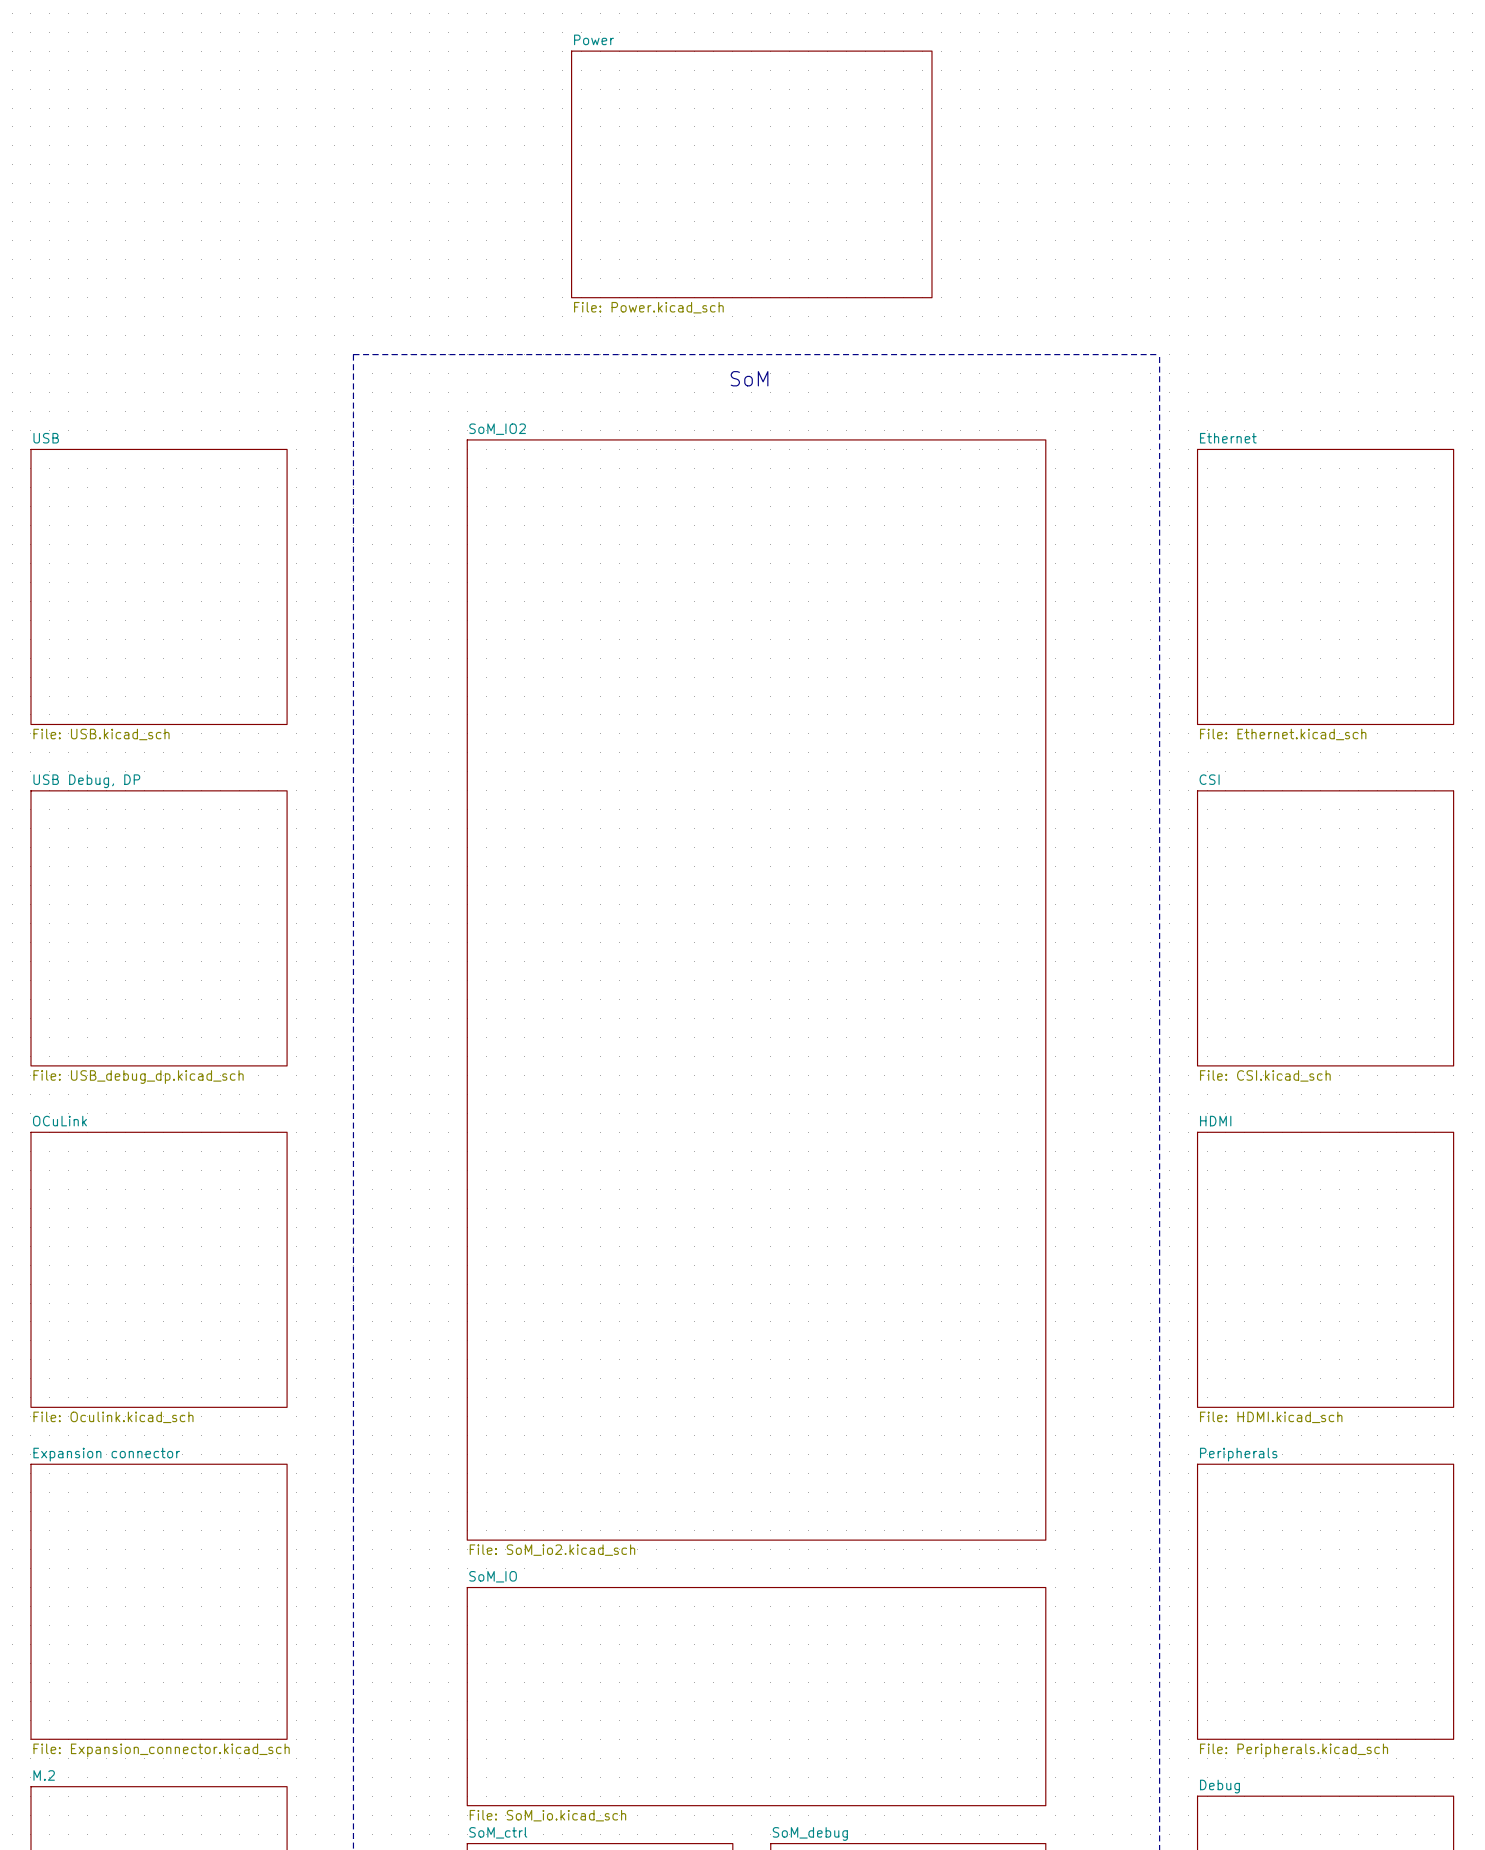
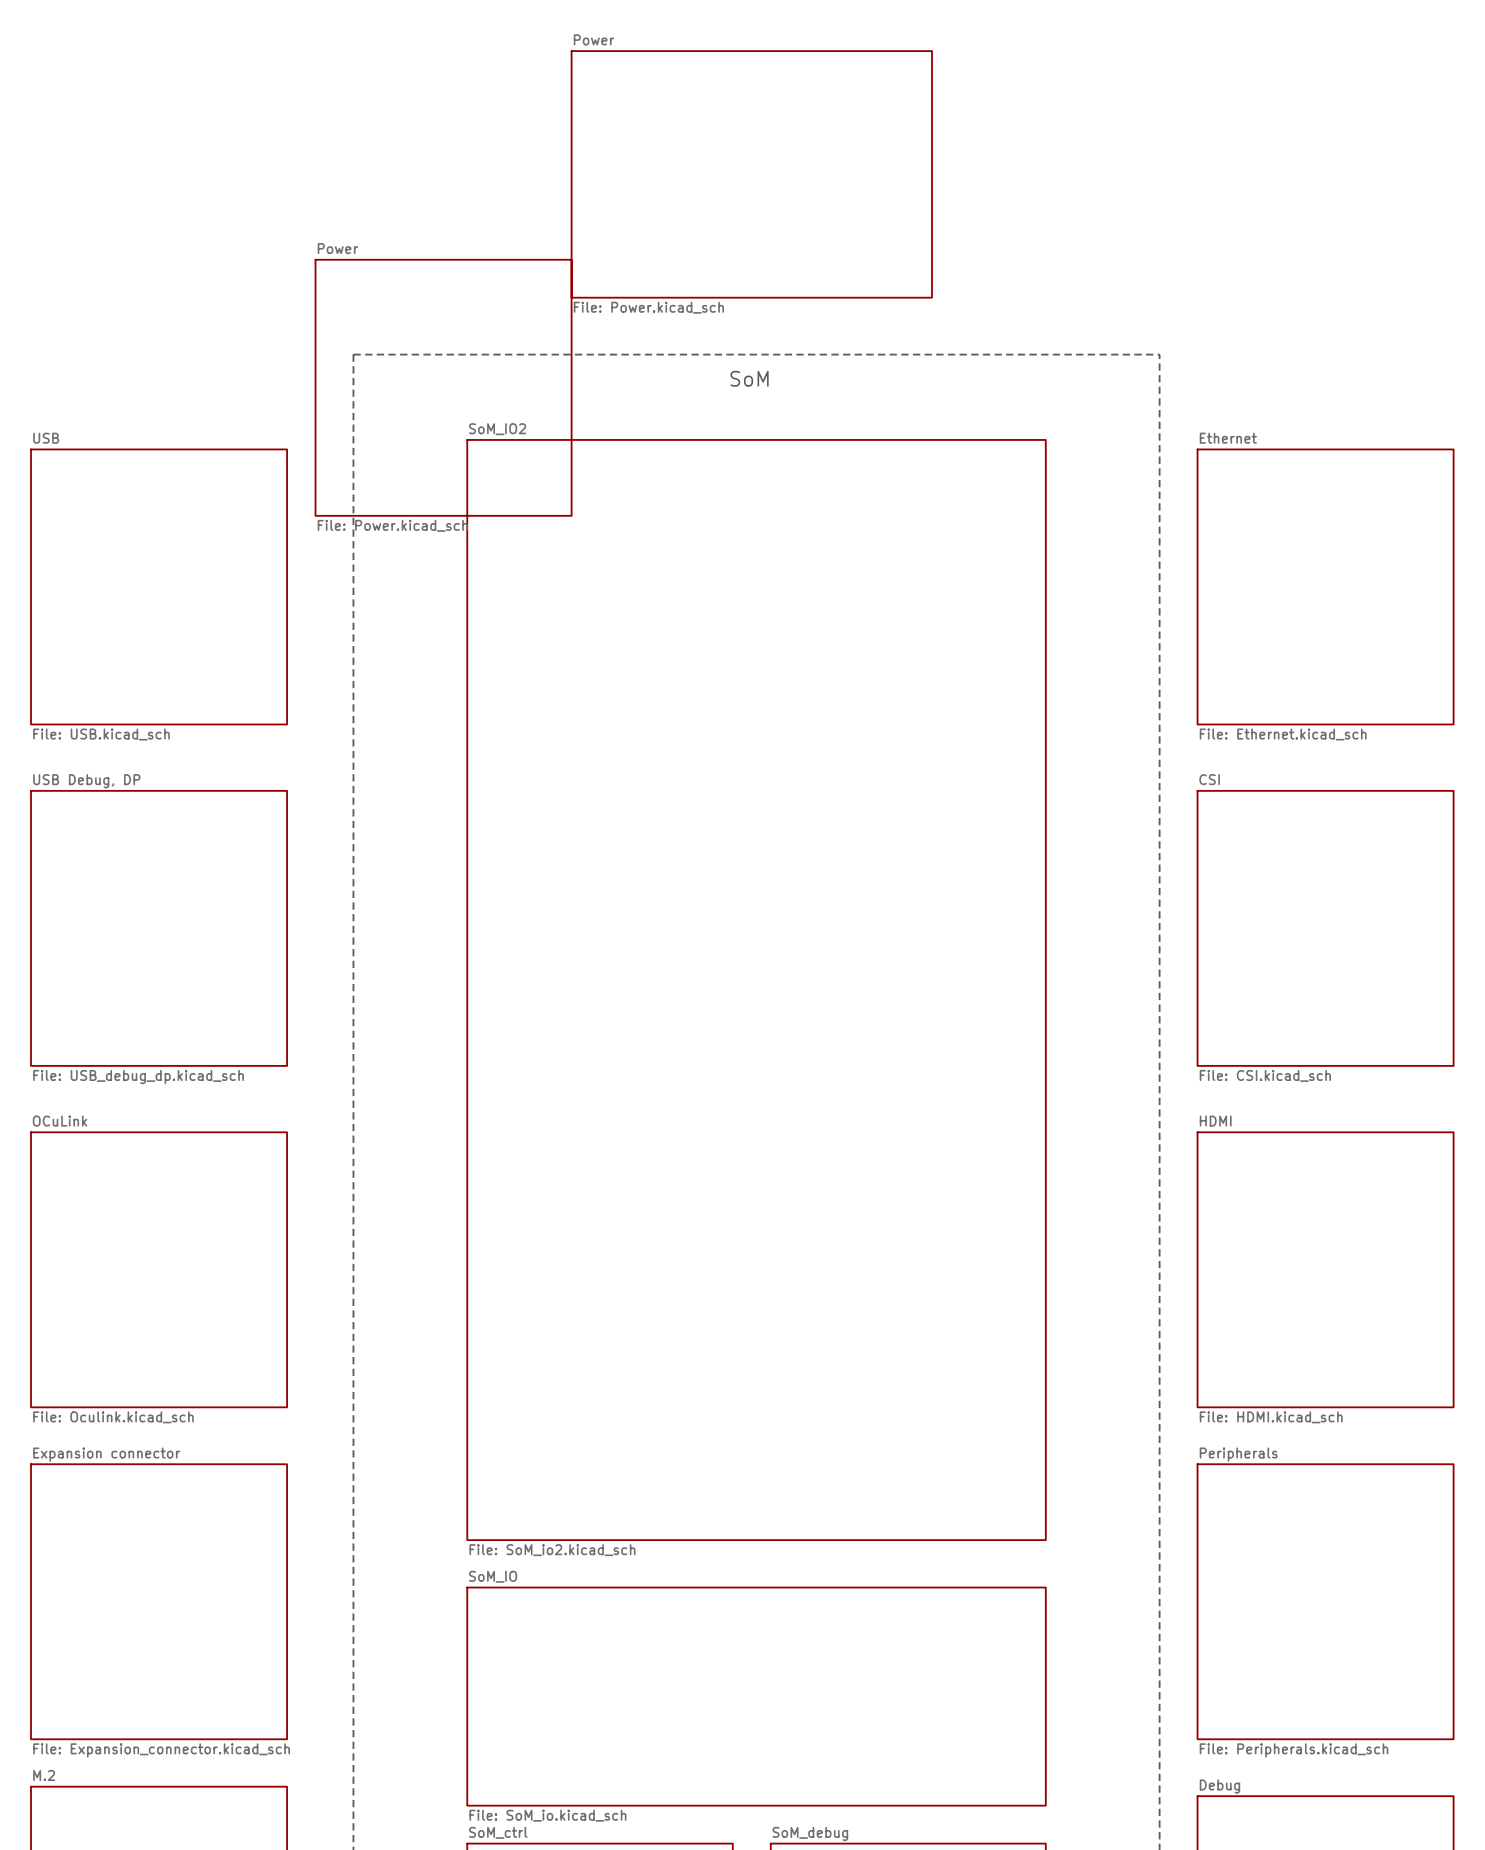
sheet Power: none -> File: Power.kicad_sch (443, 387)

